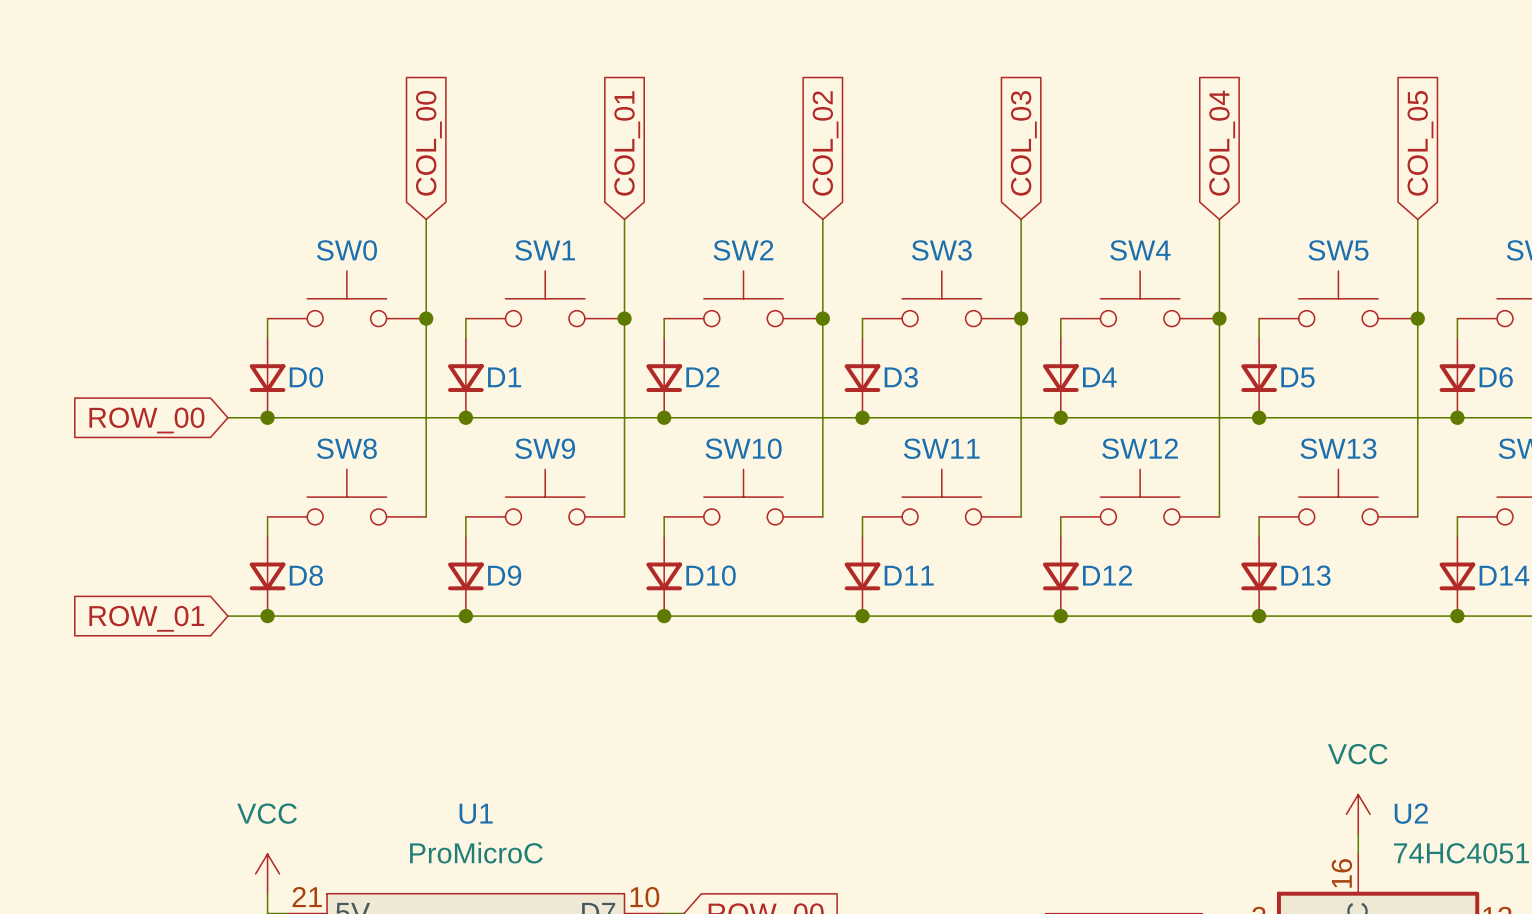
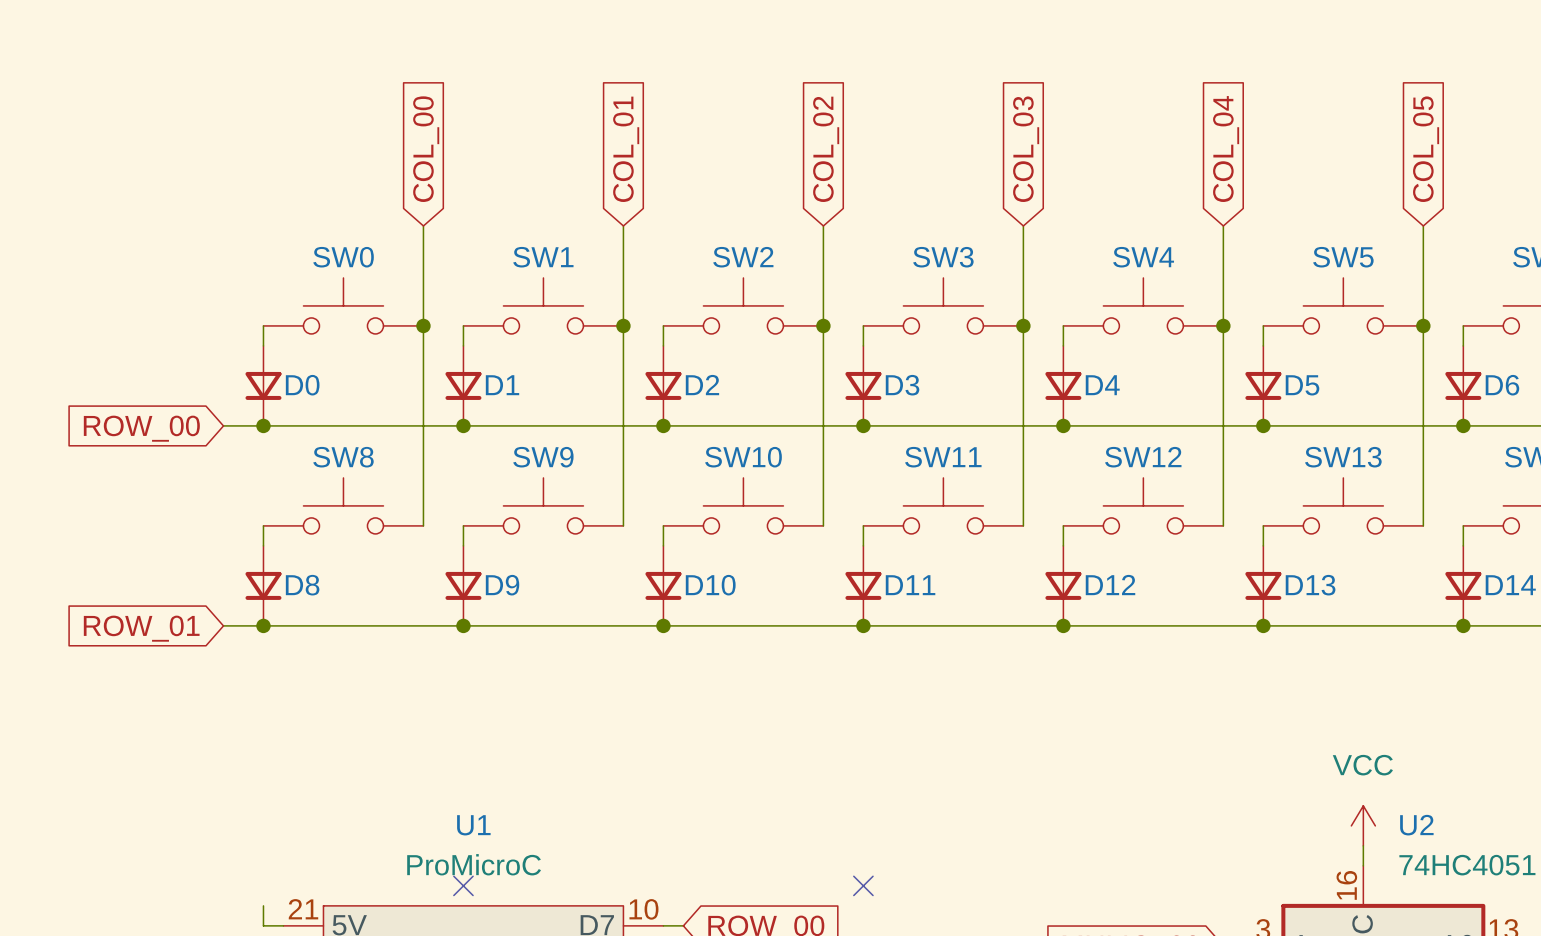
power symbol: VCC (267, 873) -> none
no-connect mark: none -> (463, 885)
no-connect mark: none -> (863, 885)

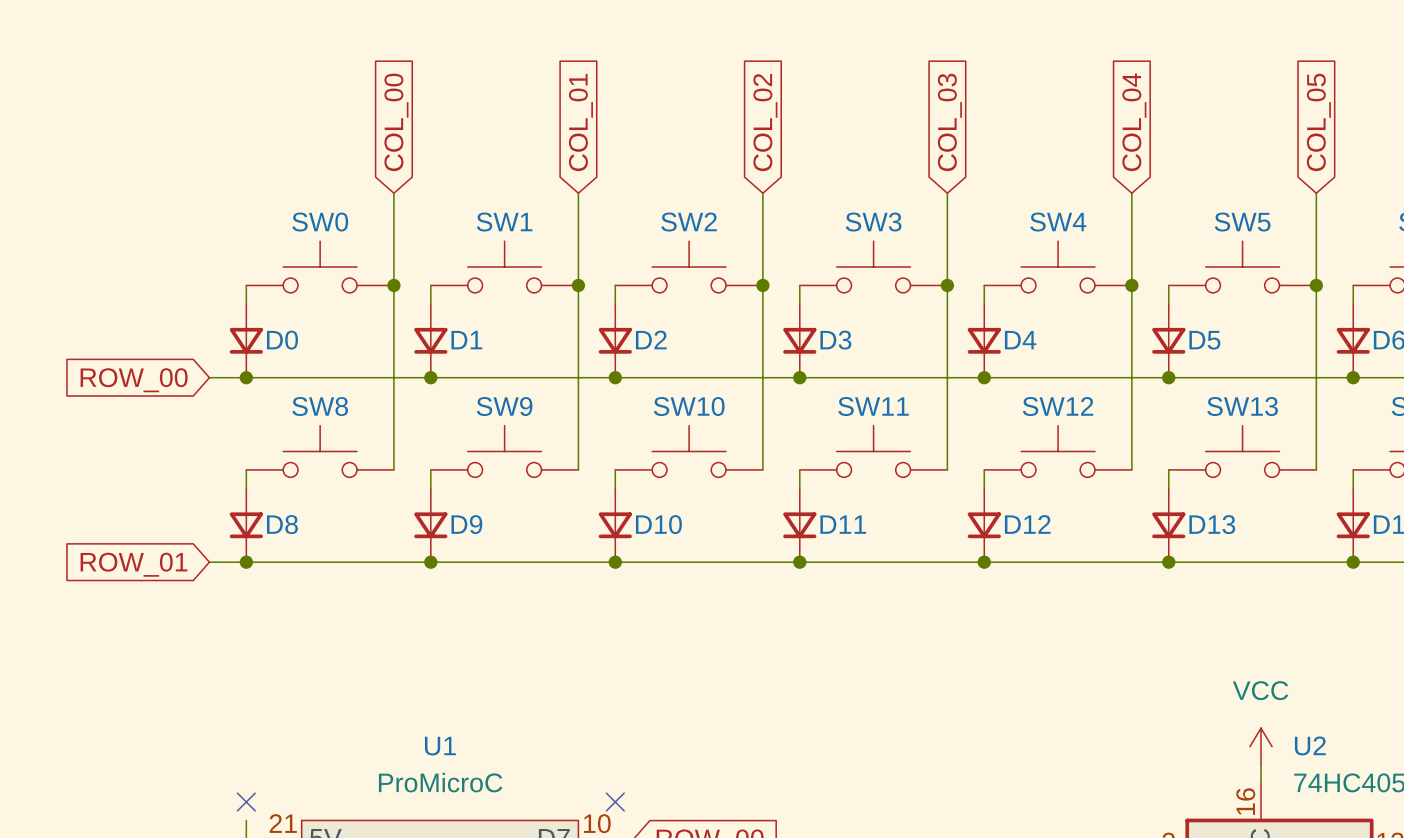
no-connect mark: none -> (246, 802)
no-connect mark: (463, 885) -> none
no-connect mark: none -> (615, 802)
no-connect mark: (863, 885) -> none

